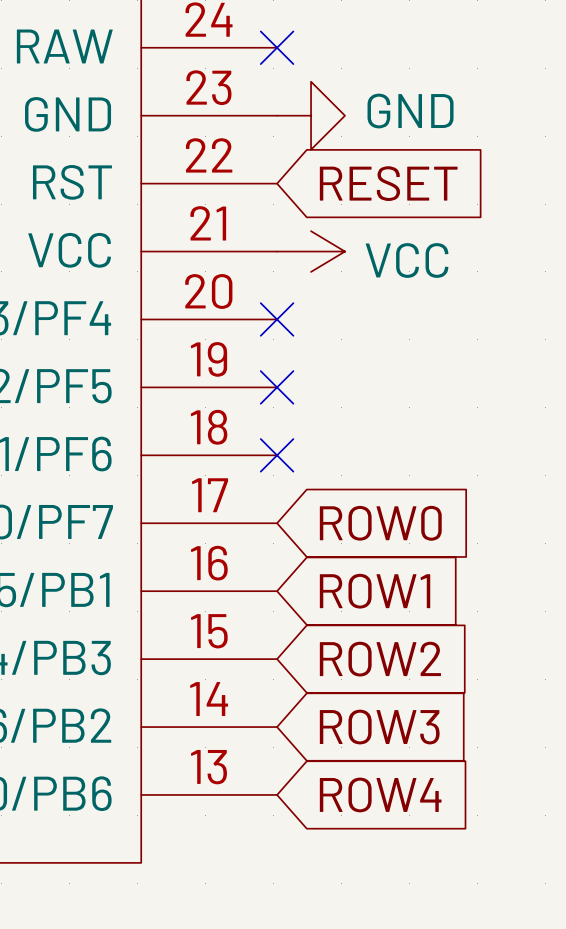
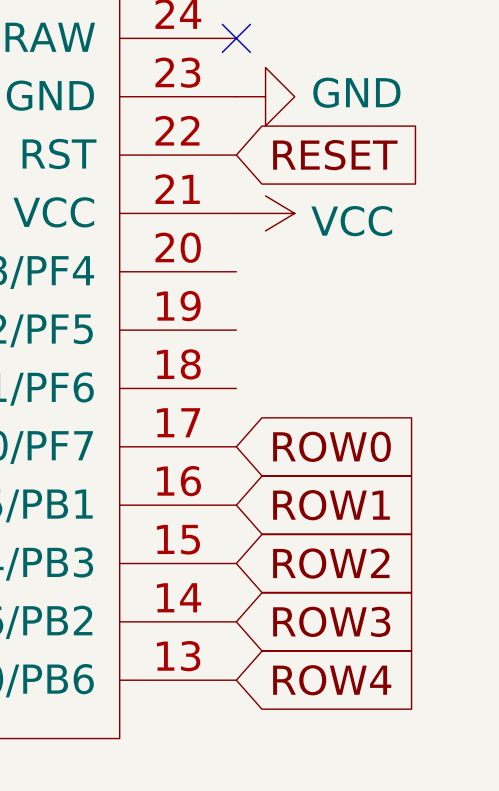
no-connect mark: (277, 319) -> none
no-connect mark: (277, 387) -> none
no-connect mark: (277, 455) -> none

